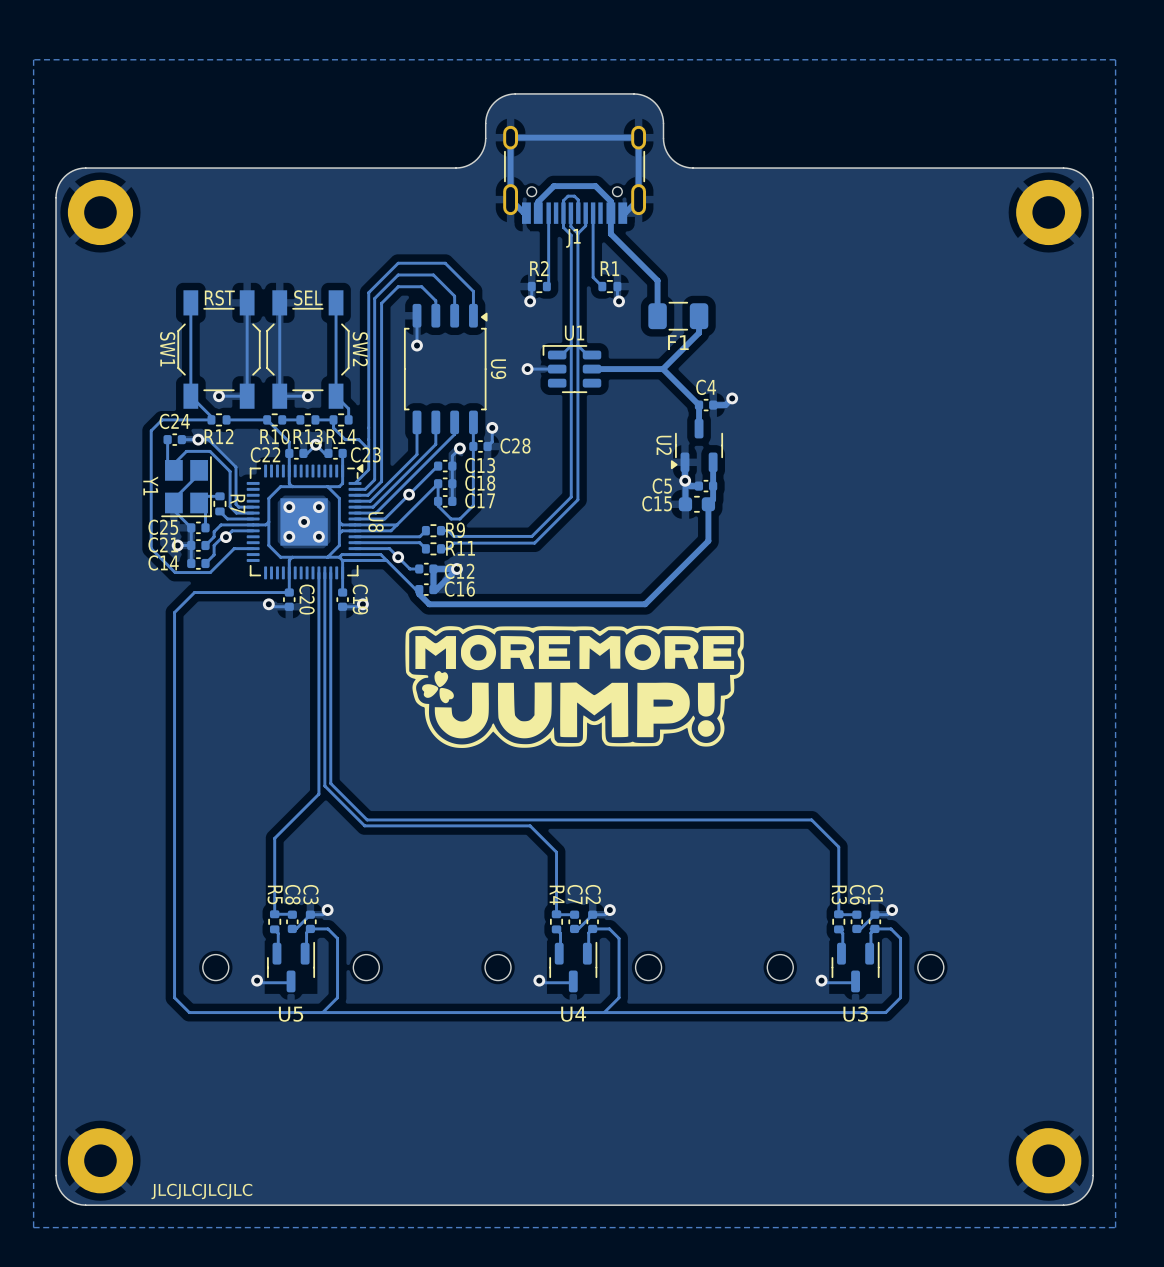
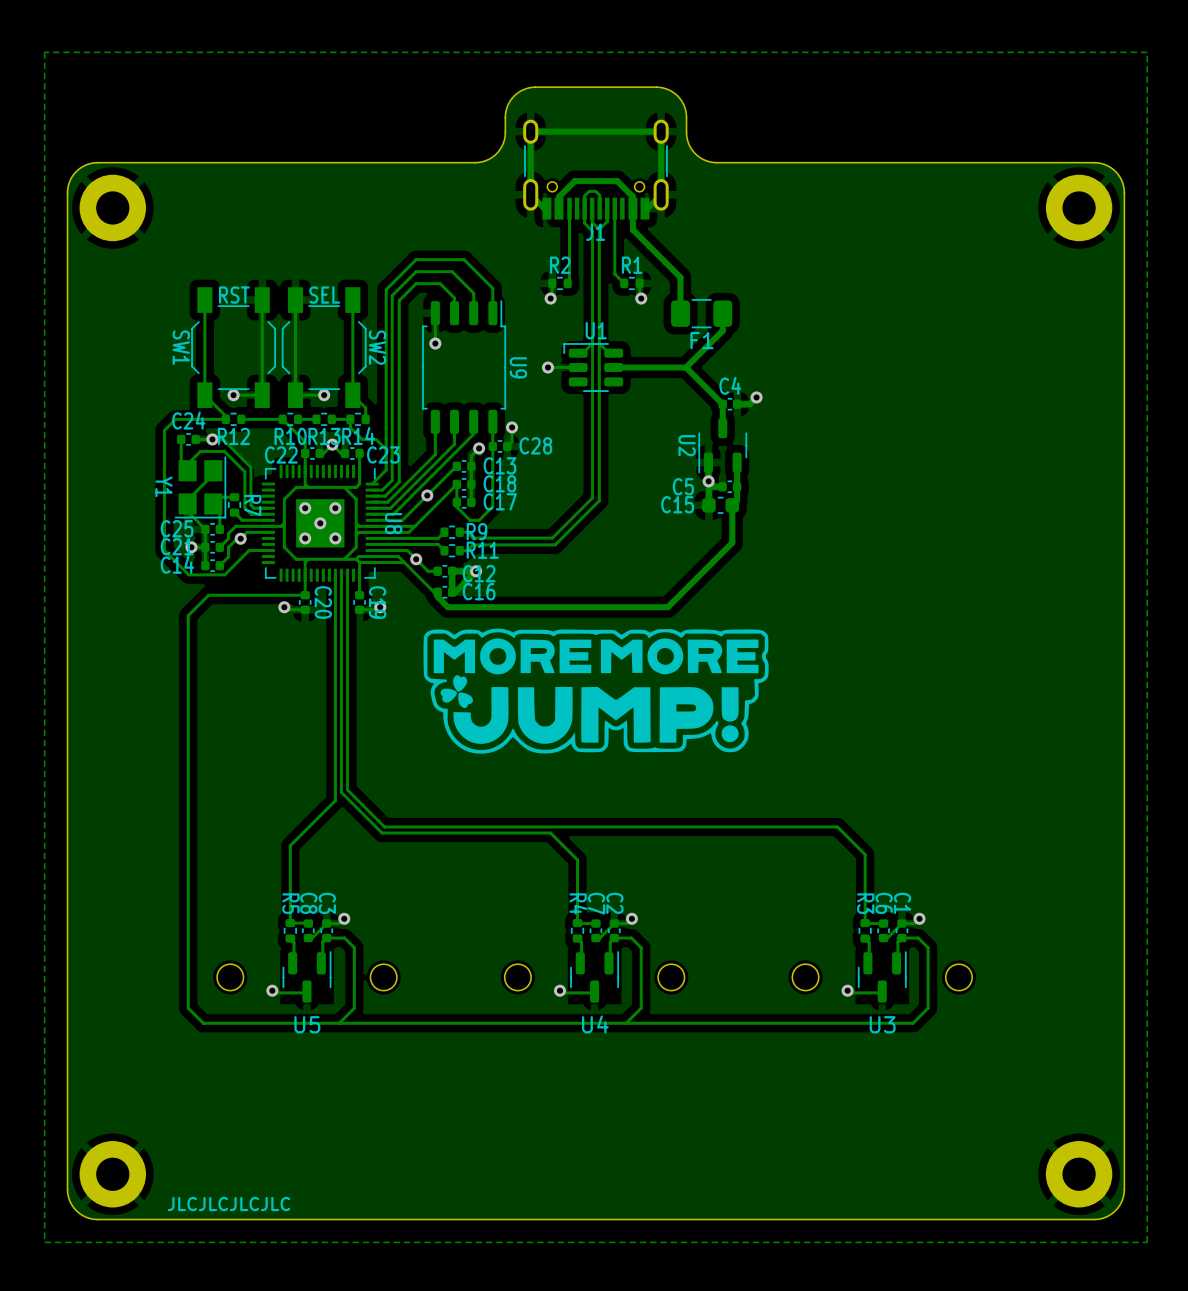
U9 footprint: [403, 303, 488, 435] -> [422, 300, 507, 434]
U2 footprint: [670, 418, 724, 473] -> [698, 418, 748, 474]
U8 footprint: [246, 464, 364, 580] -> [261, 464, 379, 582]

